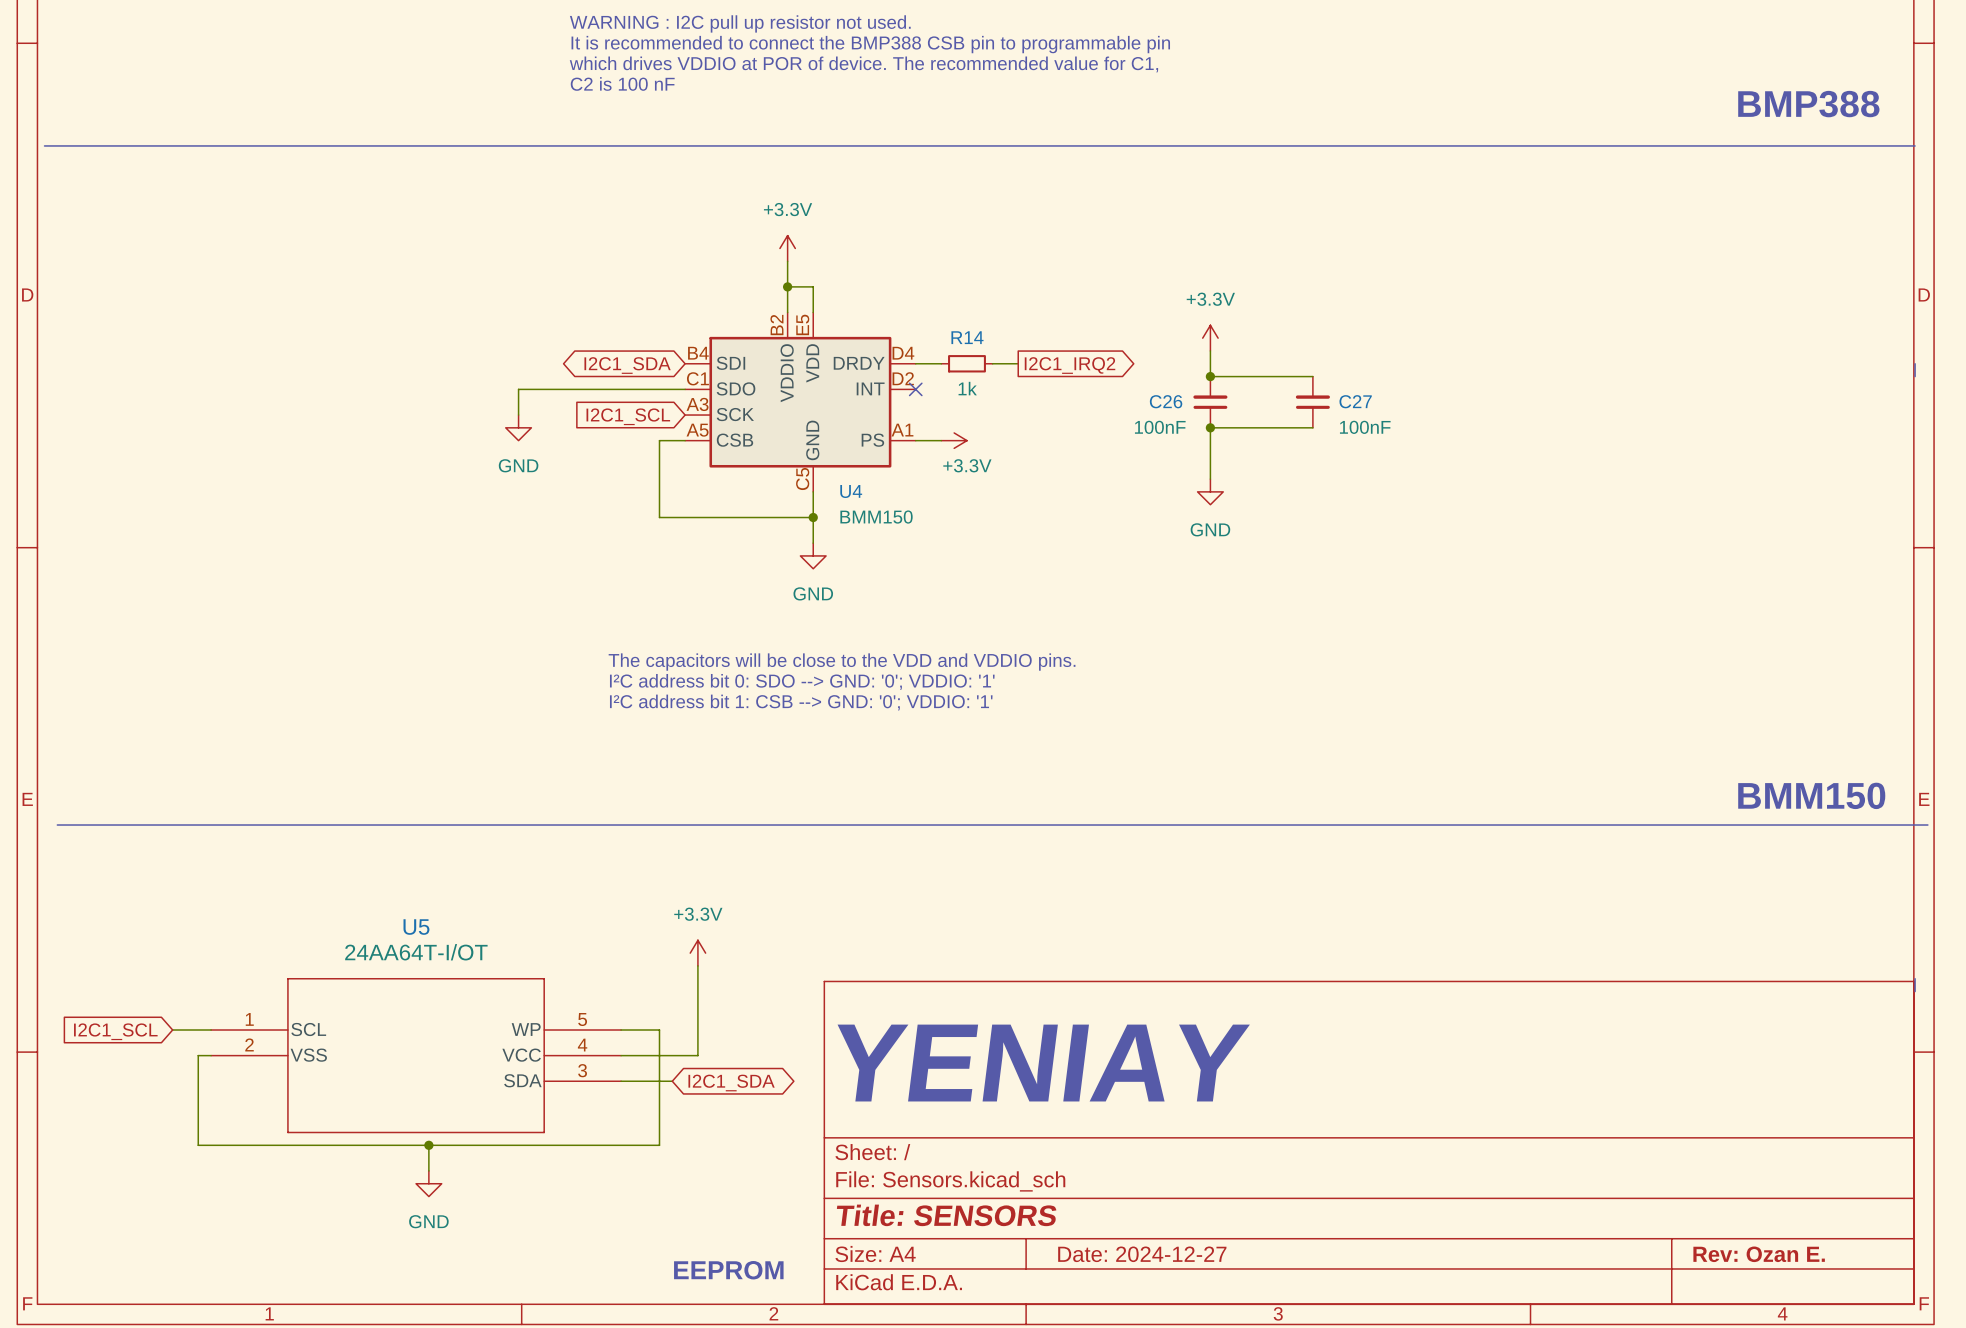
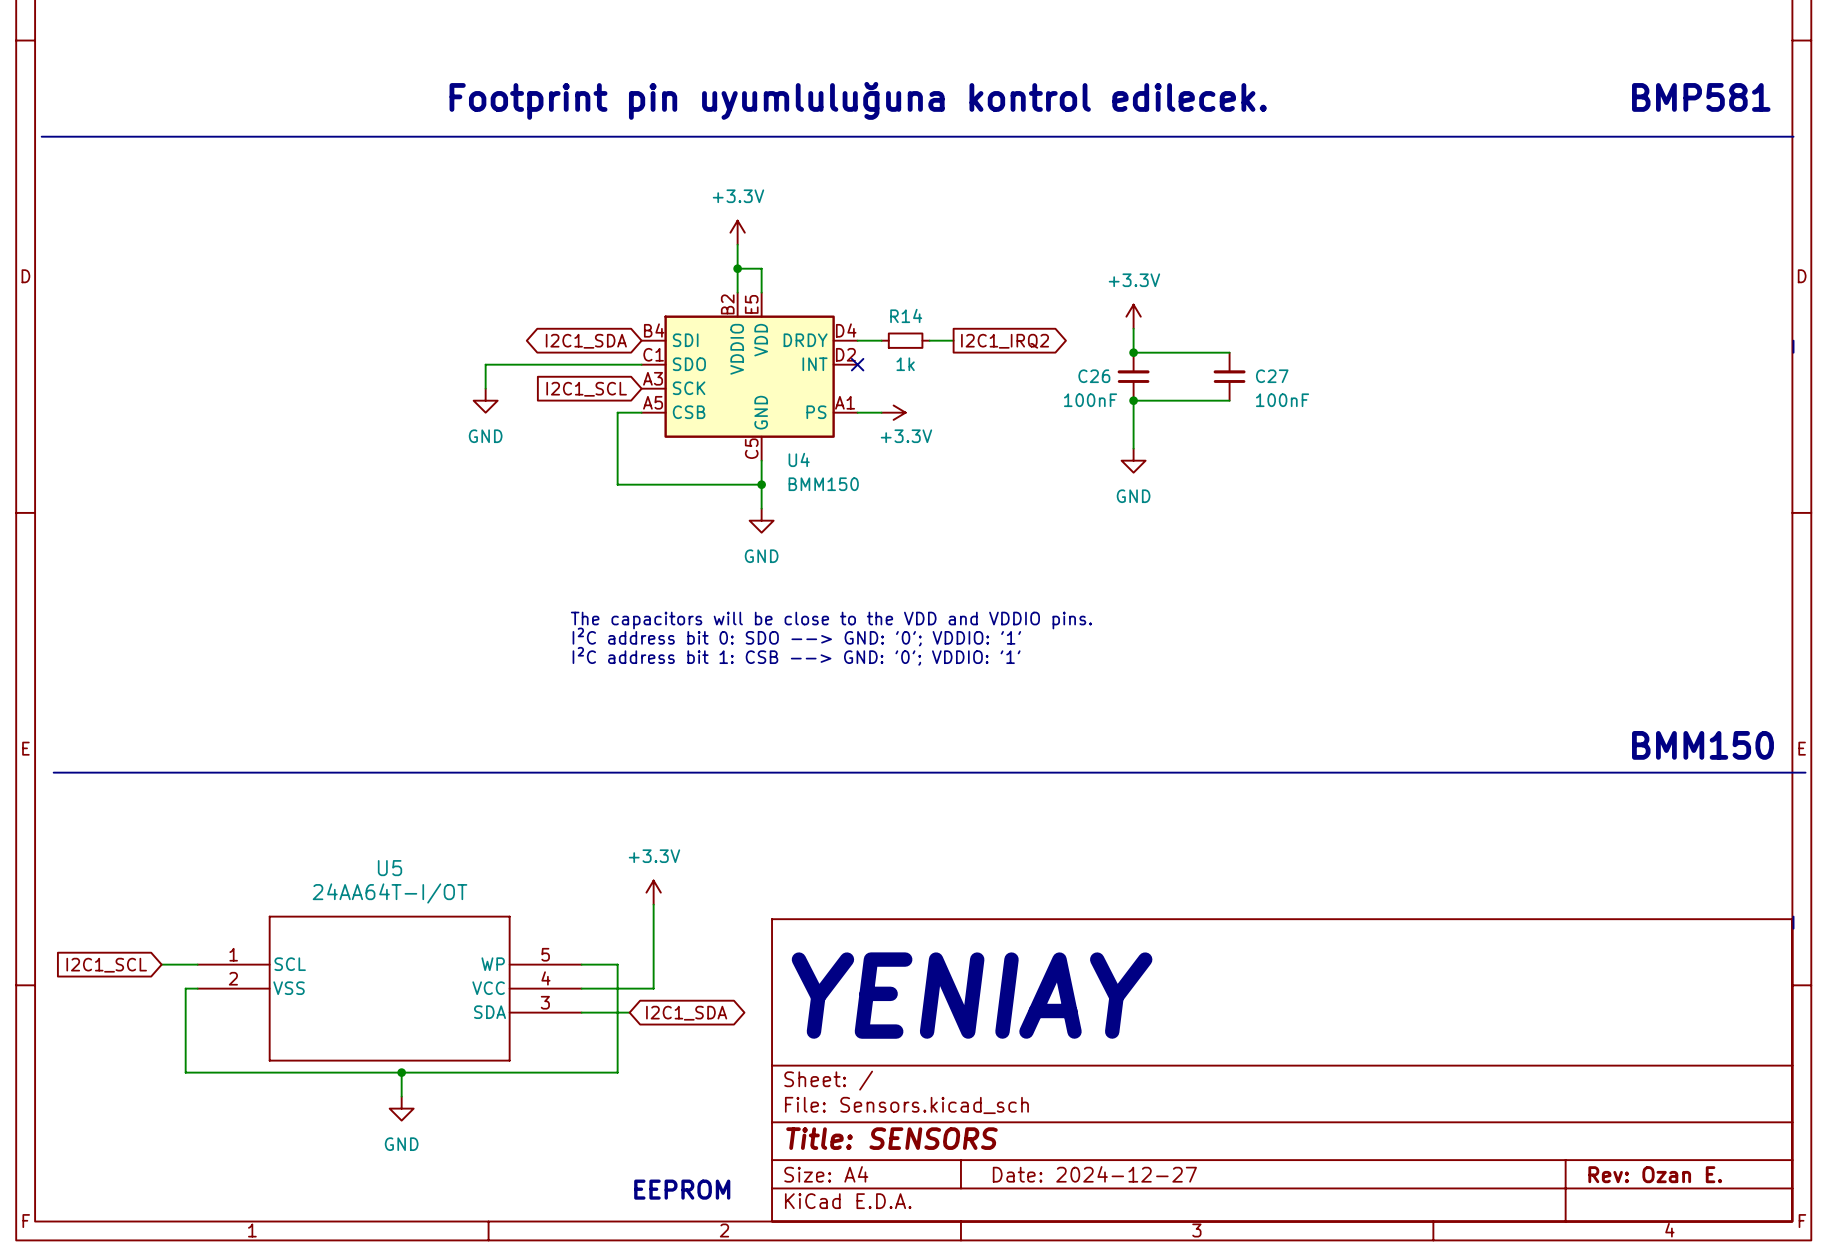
text: WARNING : I2C pull up resistor not used. (740, 23) -> none
text: It is recommended to connect the BMP388 CSB pin to programmable pin (870, 44) -> none
text: which drives VDDIO at POR of device. The recommended value for C1, (863, 64) -> none
text: C2 is 100 nF (622, 83) -> none
text: BMP388 (1808, 104) -> BMP581 (1701, 97)
text: none -> Footprint pin uyumluluğuna kontrol edilecek. (858, 100)

